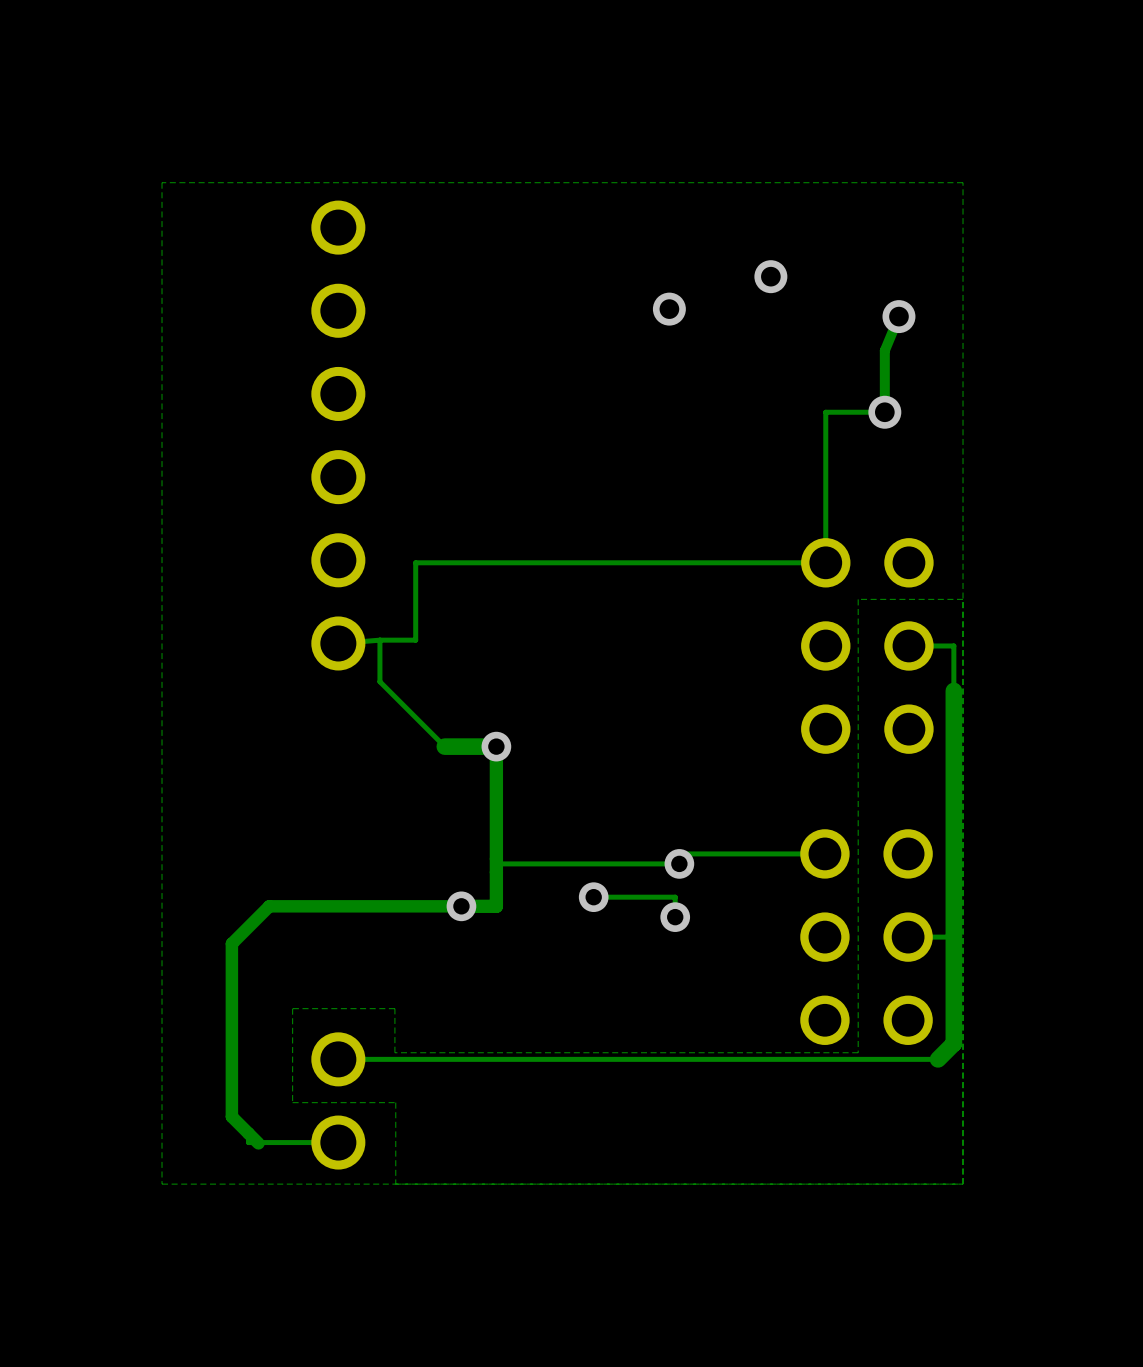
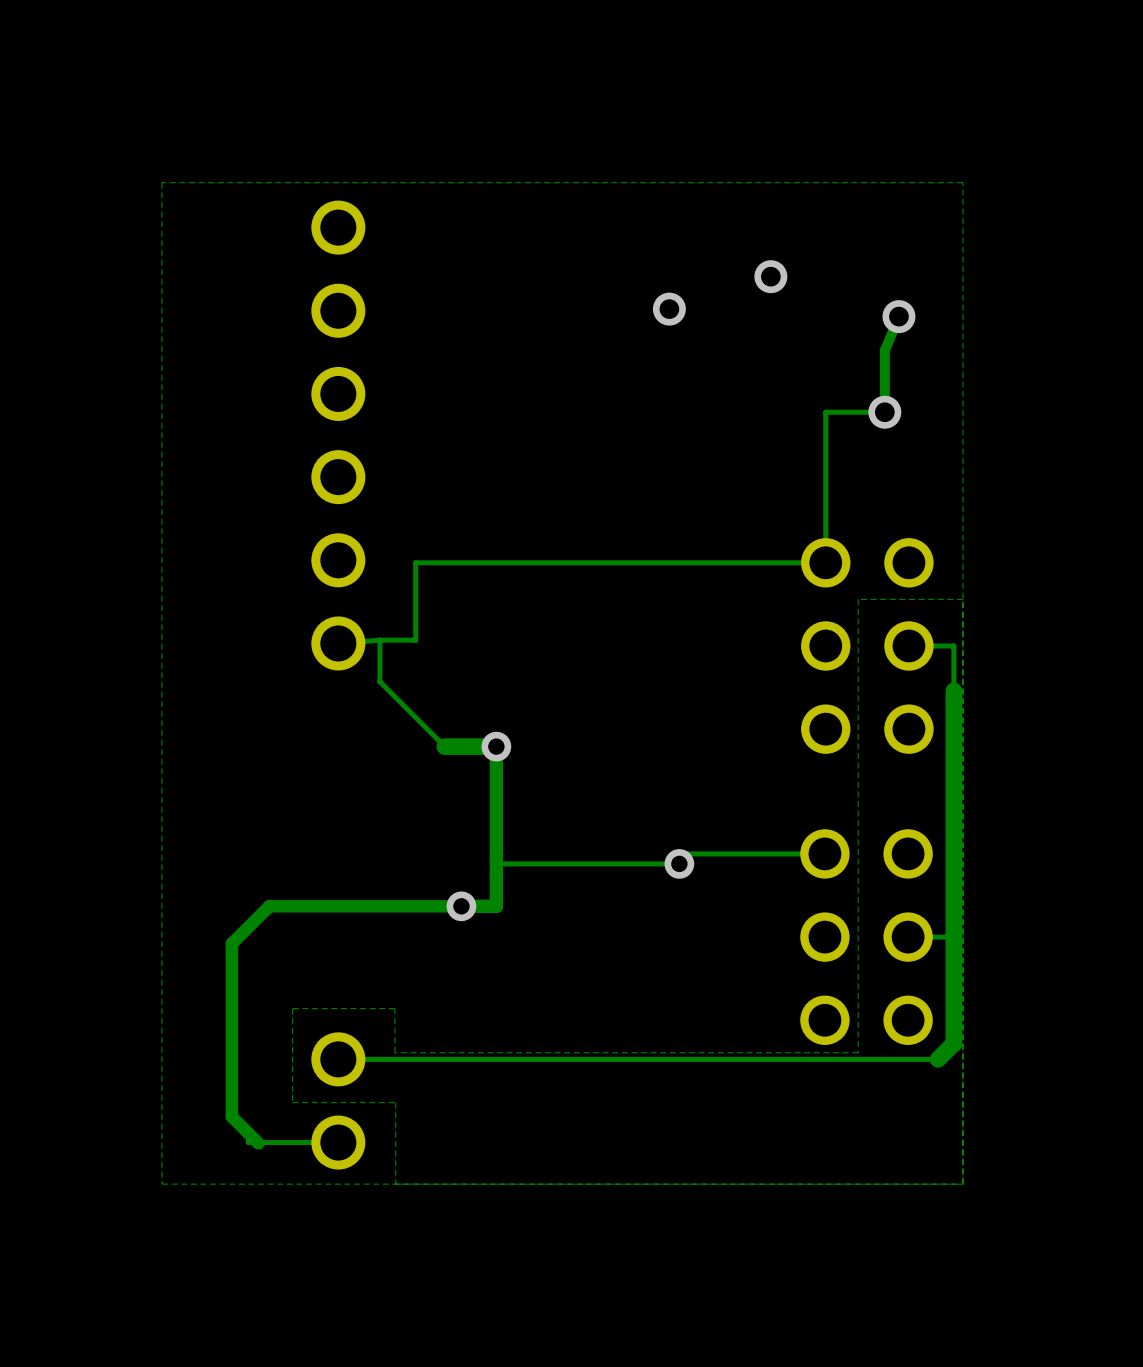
track: (593, 897) (675, 897) (675, 917) -> none
via: (593, 897) -> none
via: (675, 917) -> none

